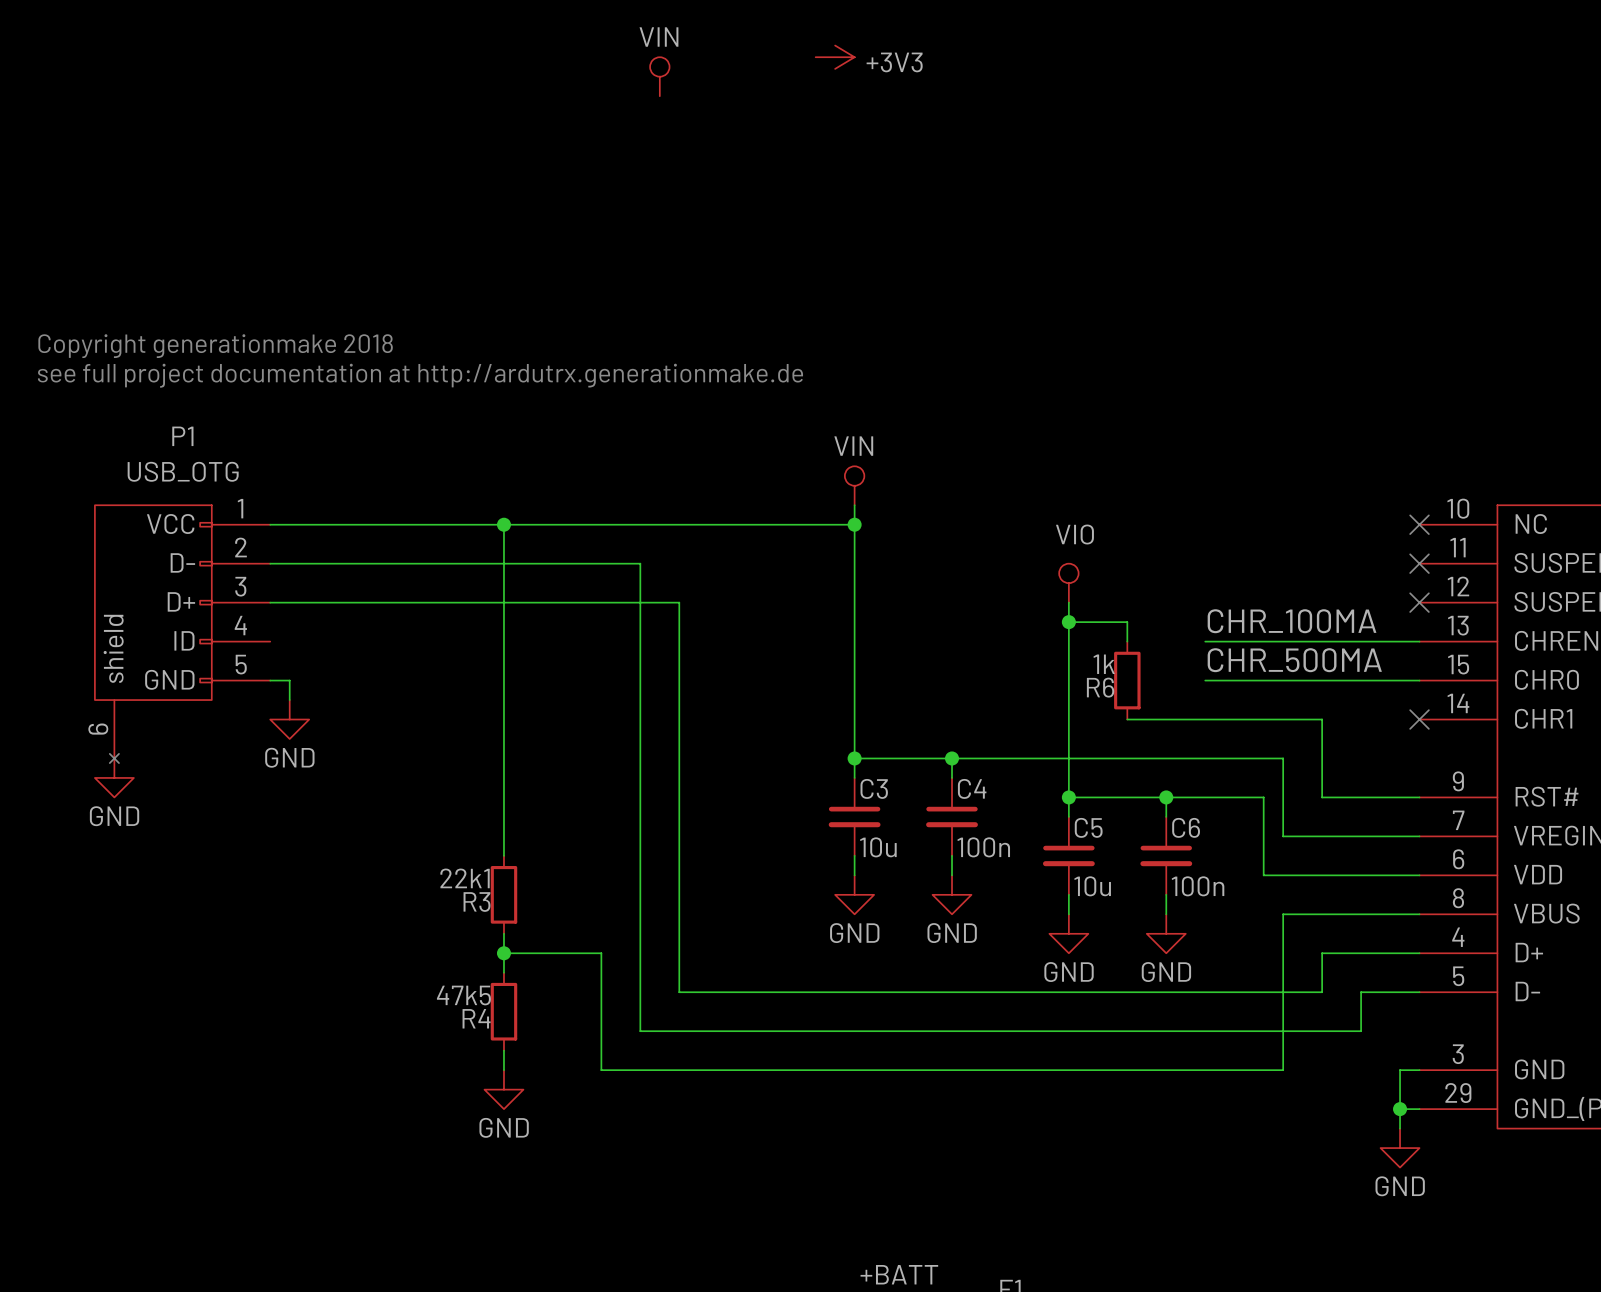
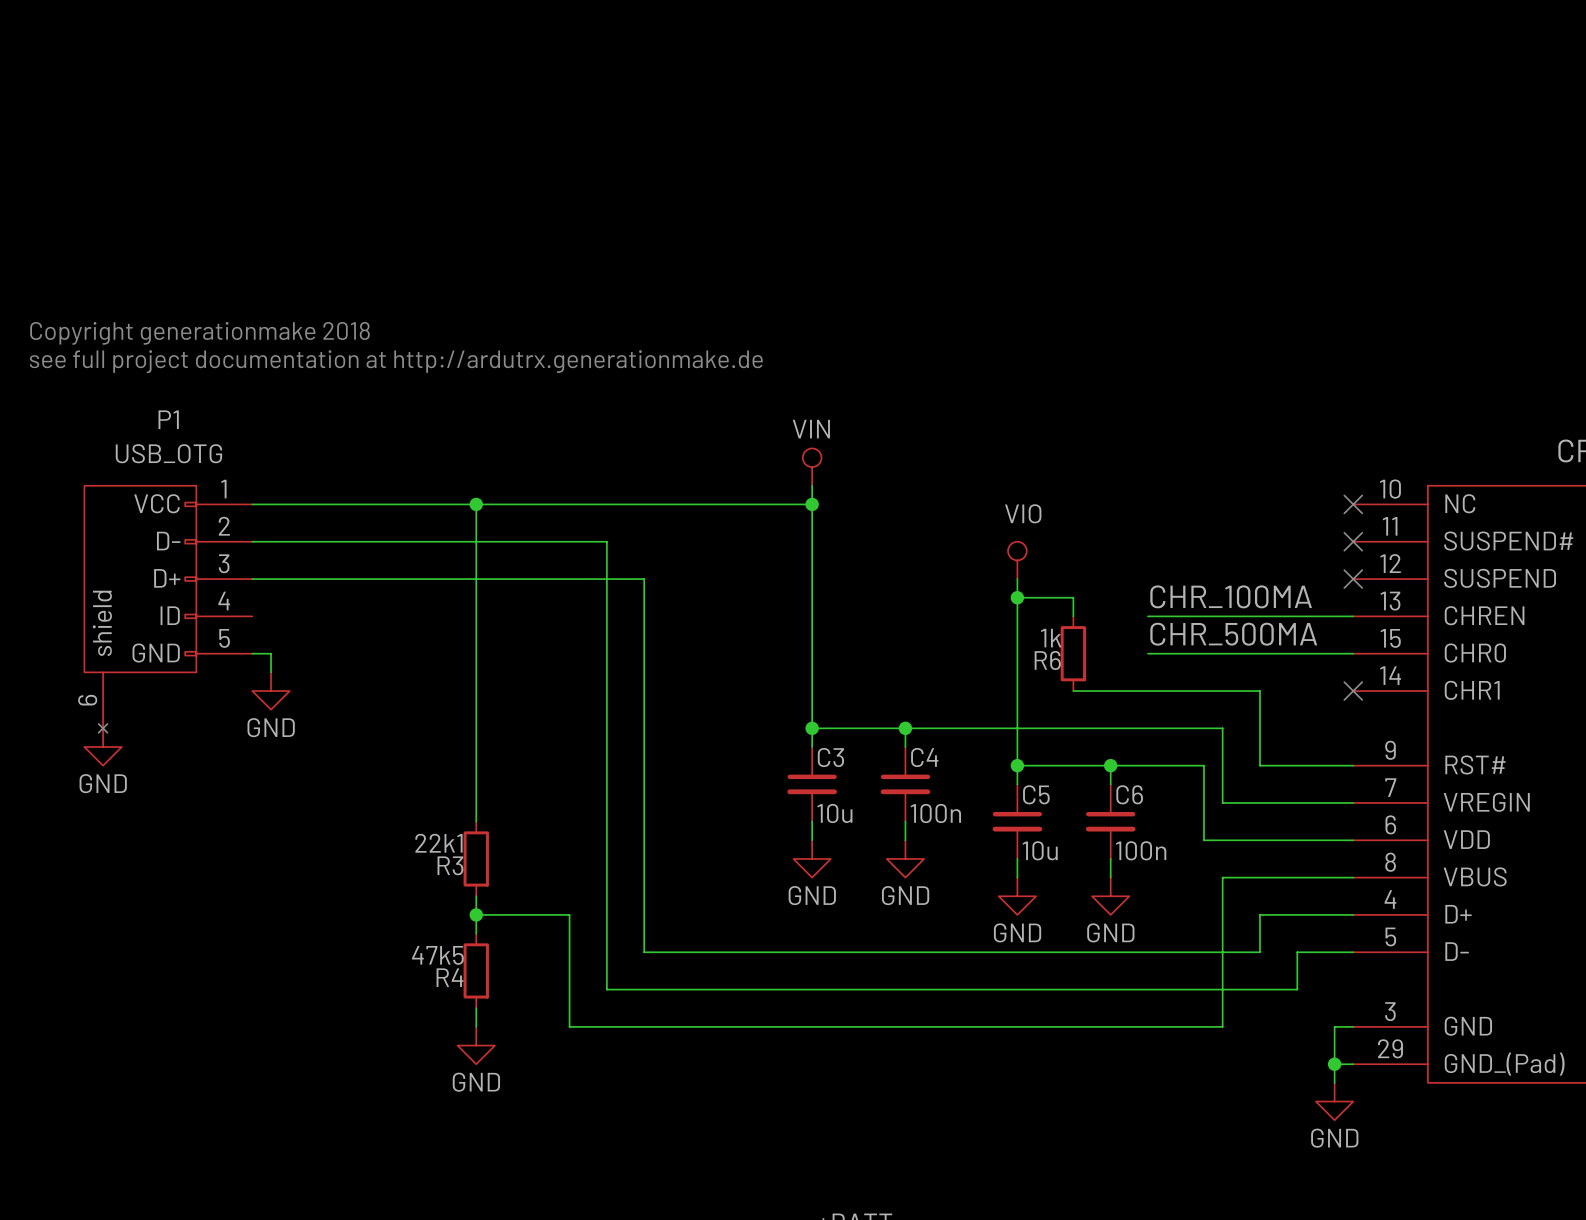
power symbol: +3V3 (835, 57) -> none
power symbol: VIN (659, 76) -> none

